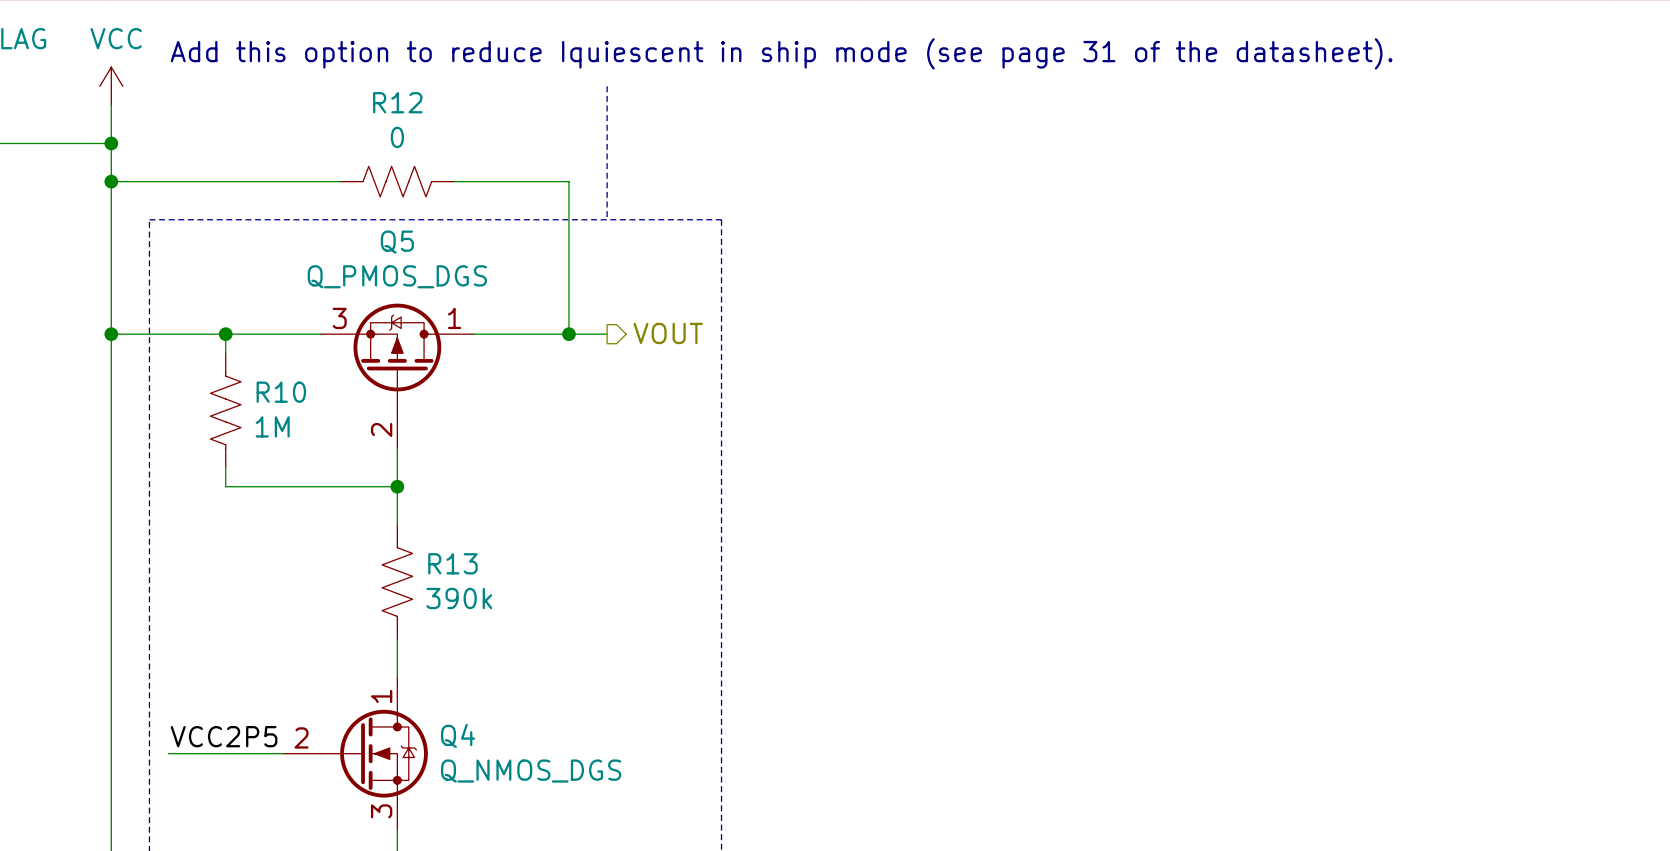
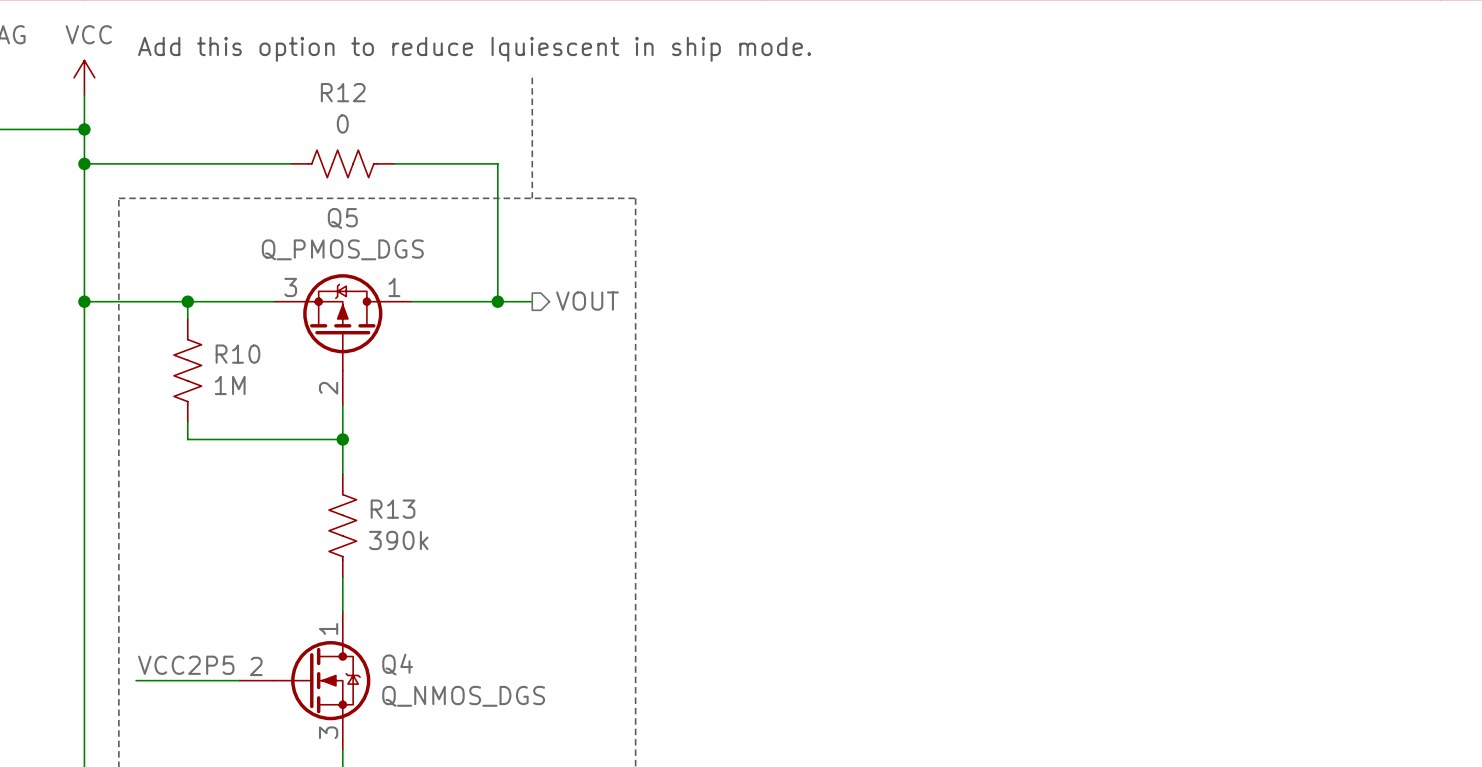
text: Add this option to reduce Iquiescent in ship mode (see page 31 of the datasheet). (781, 53) -> Add this option to reduce Iquiescent in ship mode. (474, 49)

